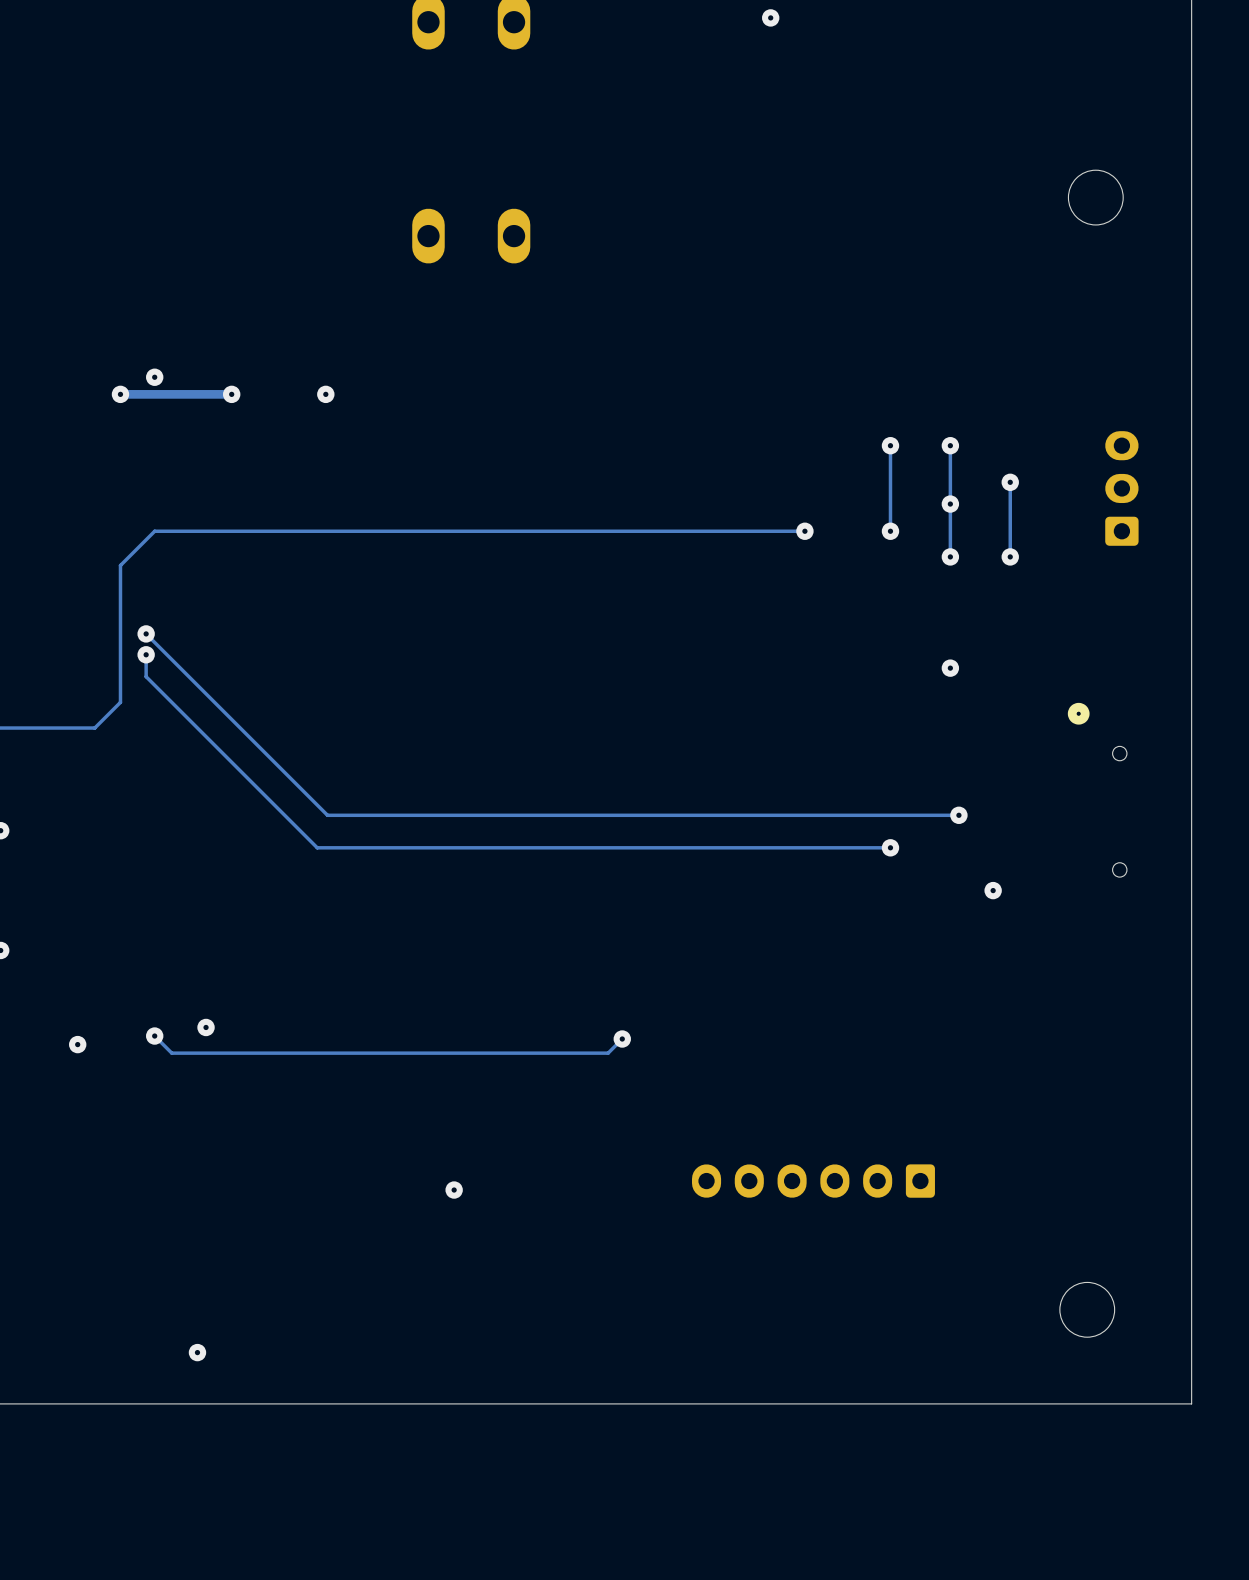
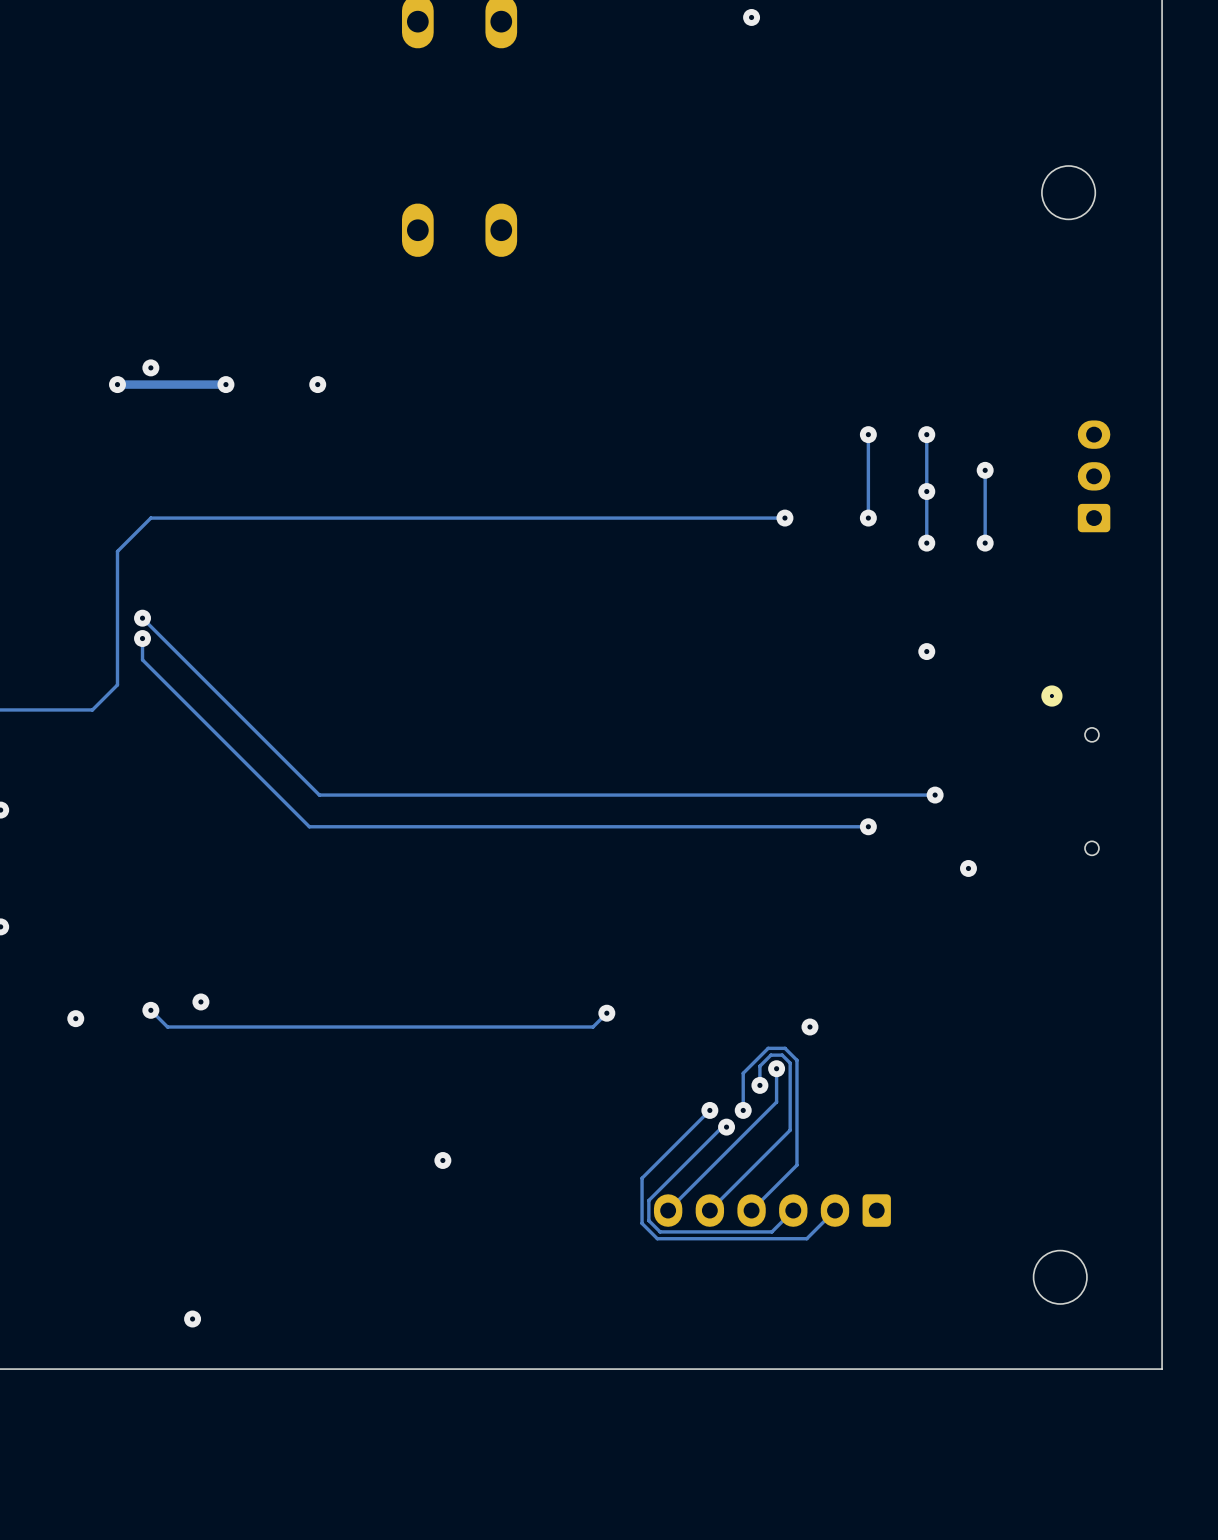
via: none -> (809, 1027)
track: none -> (776, 1068) (776, 1102) (668, 1210)
via: none -> (776, 1068)
track: none -> (759, 1085) (759, 1066) (770, 1055) (782, 1055) (790, 1063) (790, 1130) (709, 1210)
via: none -> (759, 1085)
track: none -> (709, 1110) (642, 1178) (642, 1223) (657, 1238) (806, 1238) (835, 1210)
via: none -> (709, 1110)
track: none -> (743, 1110) (743, 1073) (768, 1048) (785, 1048) (796, 1060) (796, 1165) (751, 1210)
via: none -> (743, 1110)
track: none -> (726, 1127) (722, 1127) (648, 1200) (648, 1220) (660, 1231) (771, 1231) (793, 1210)
via: none -> (726, 1127)
part position: (813, 1181) -> (772, 1210)

